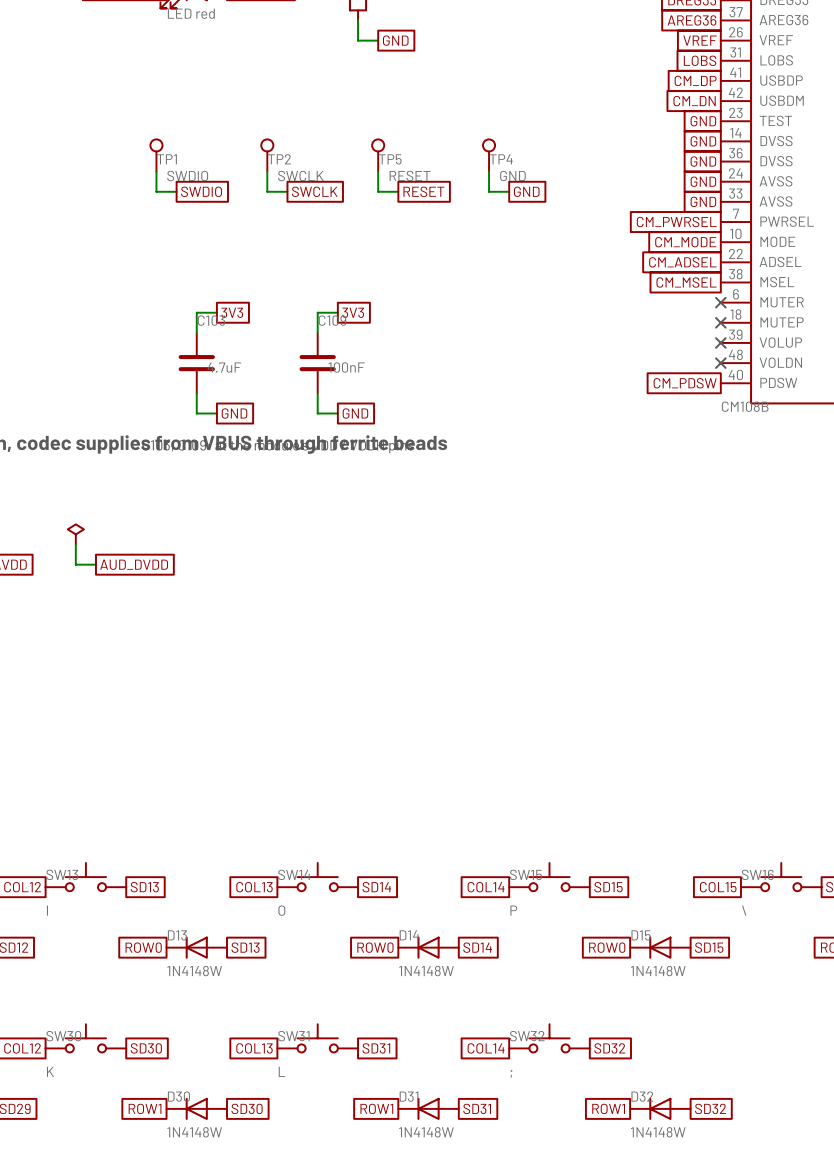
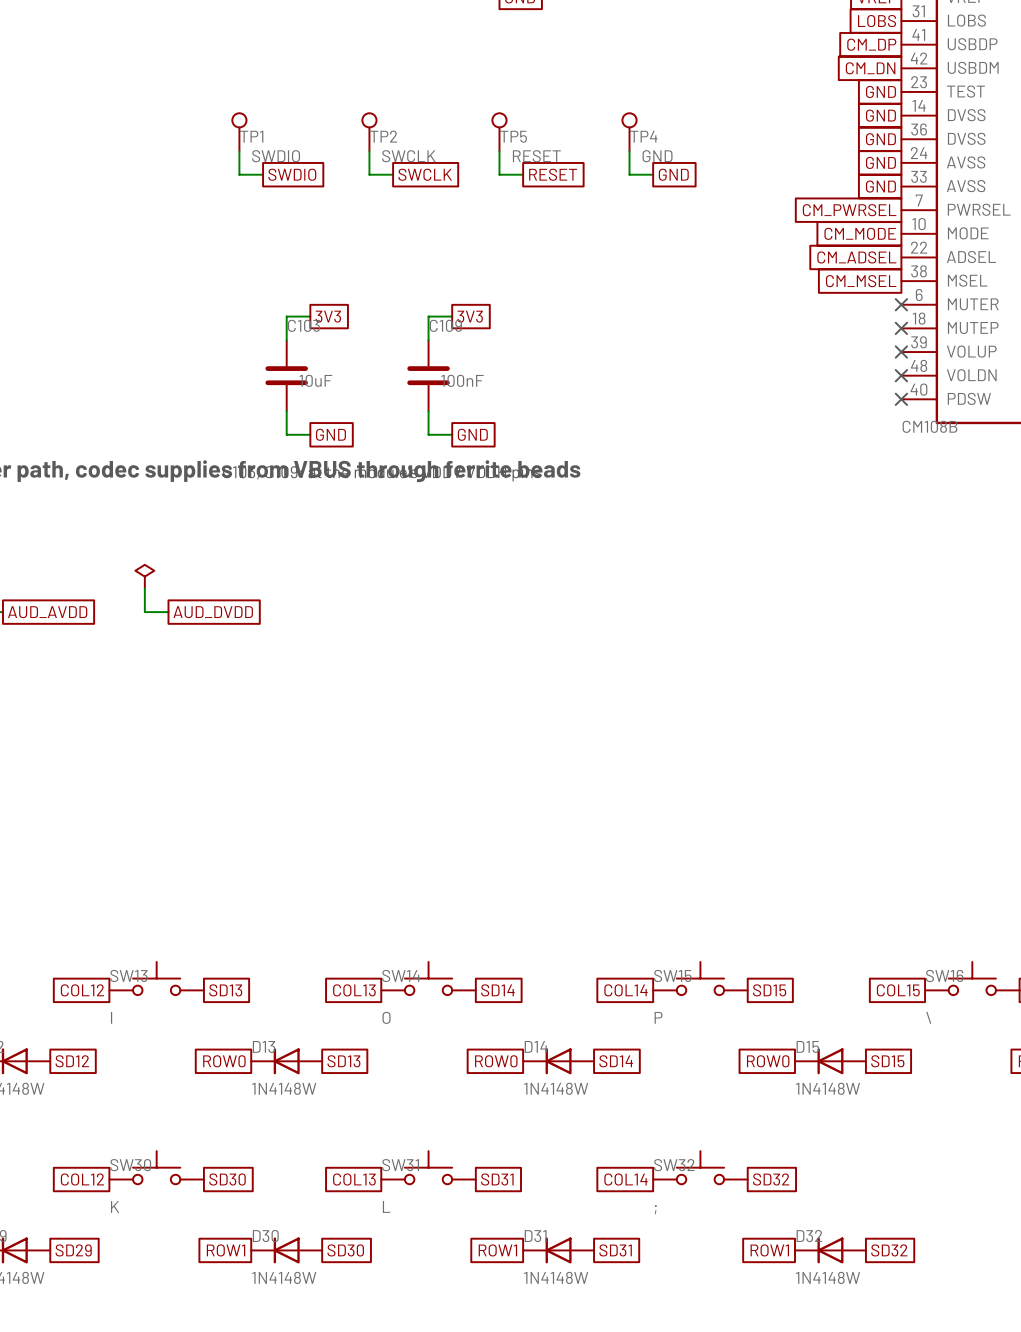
C103 value: 4.7uF (224, 367) -> 10uF (315, 380)
global label: CM_PDSW (685, 383) -> none
no-connect mark: none -> (901, 399)

